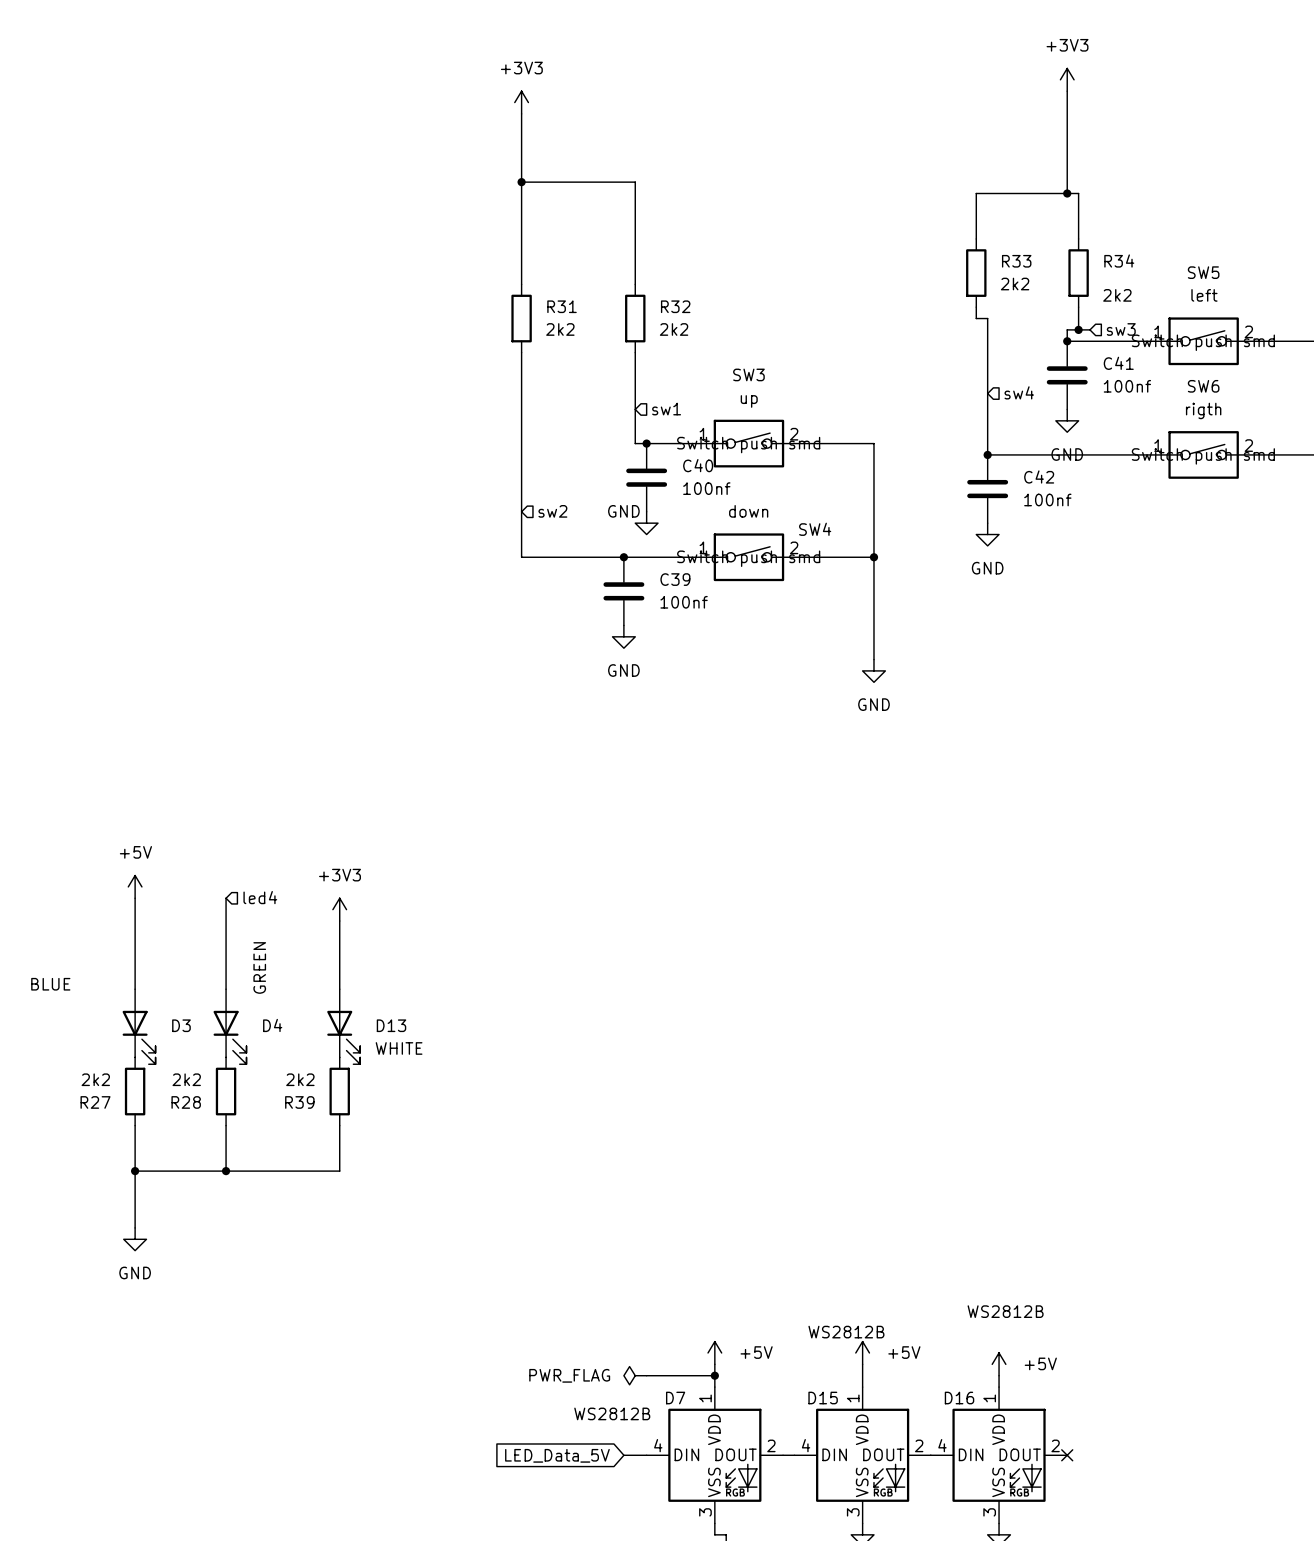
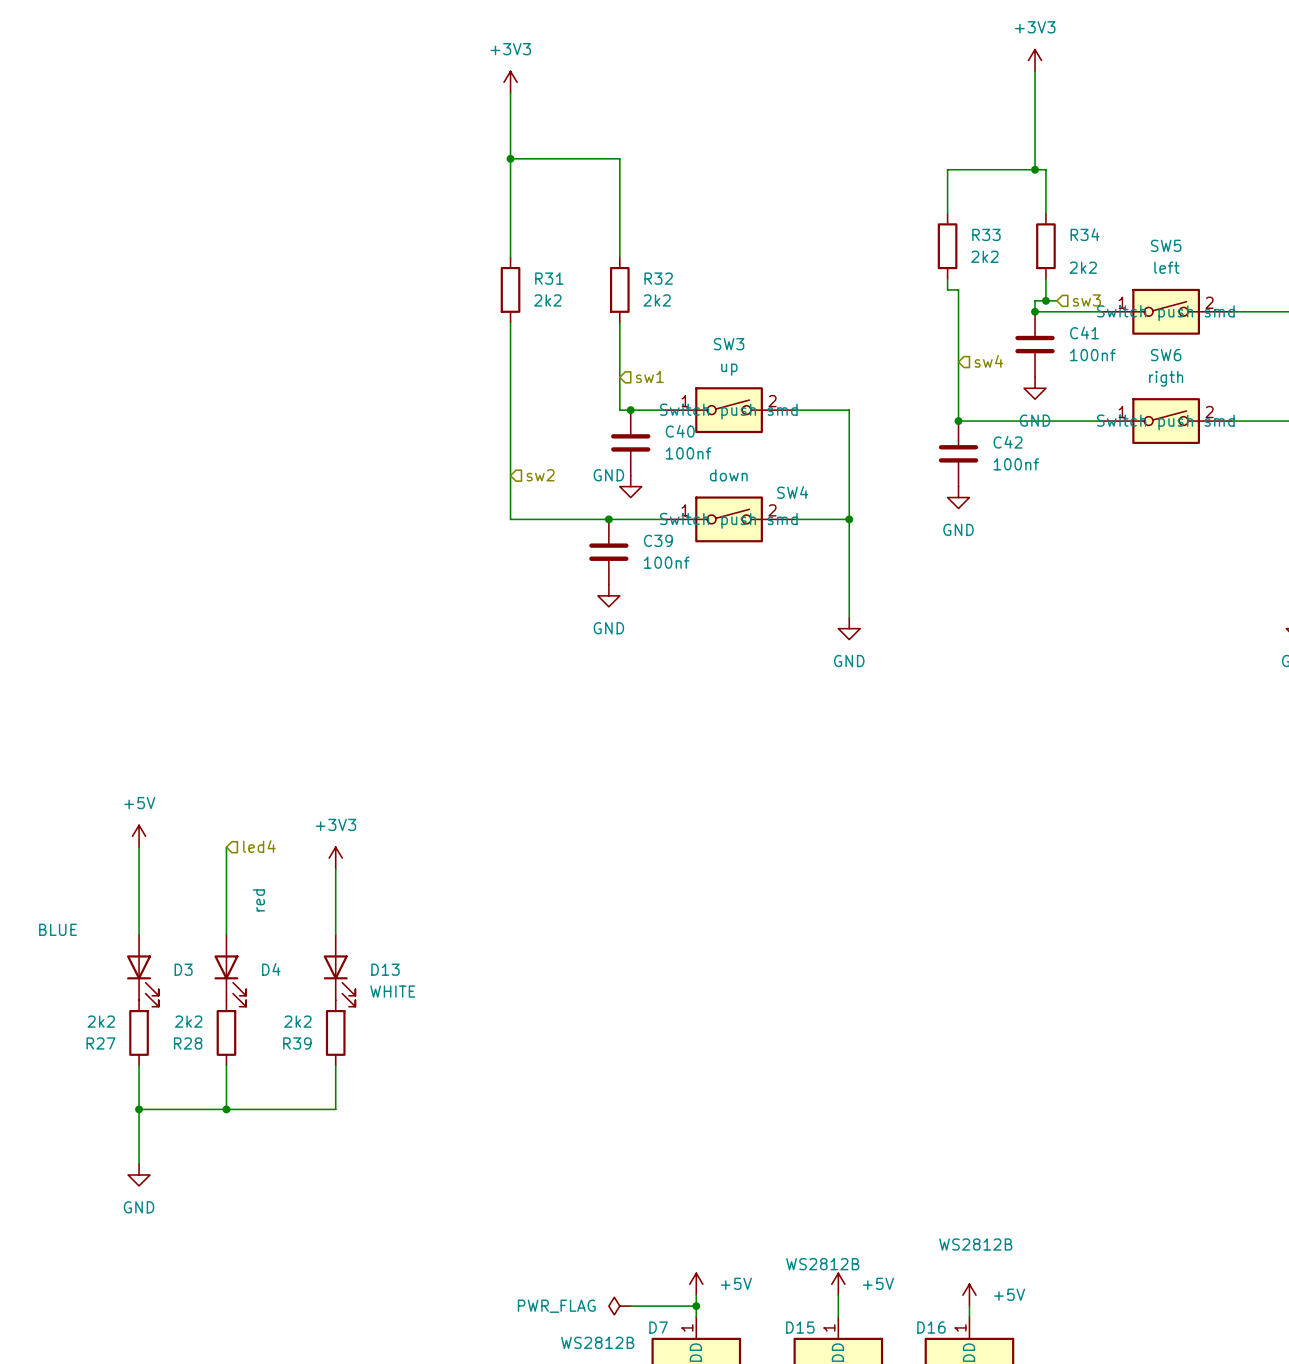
D4 value: GREEN (259, 967) -> red (258, 900)

